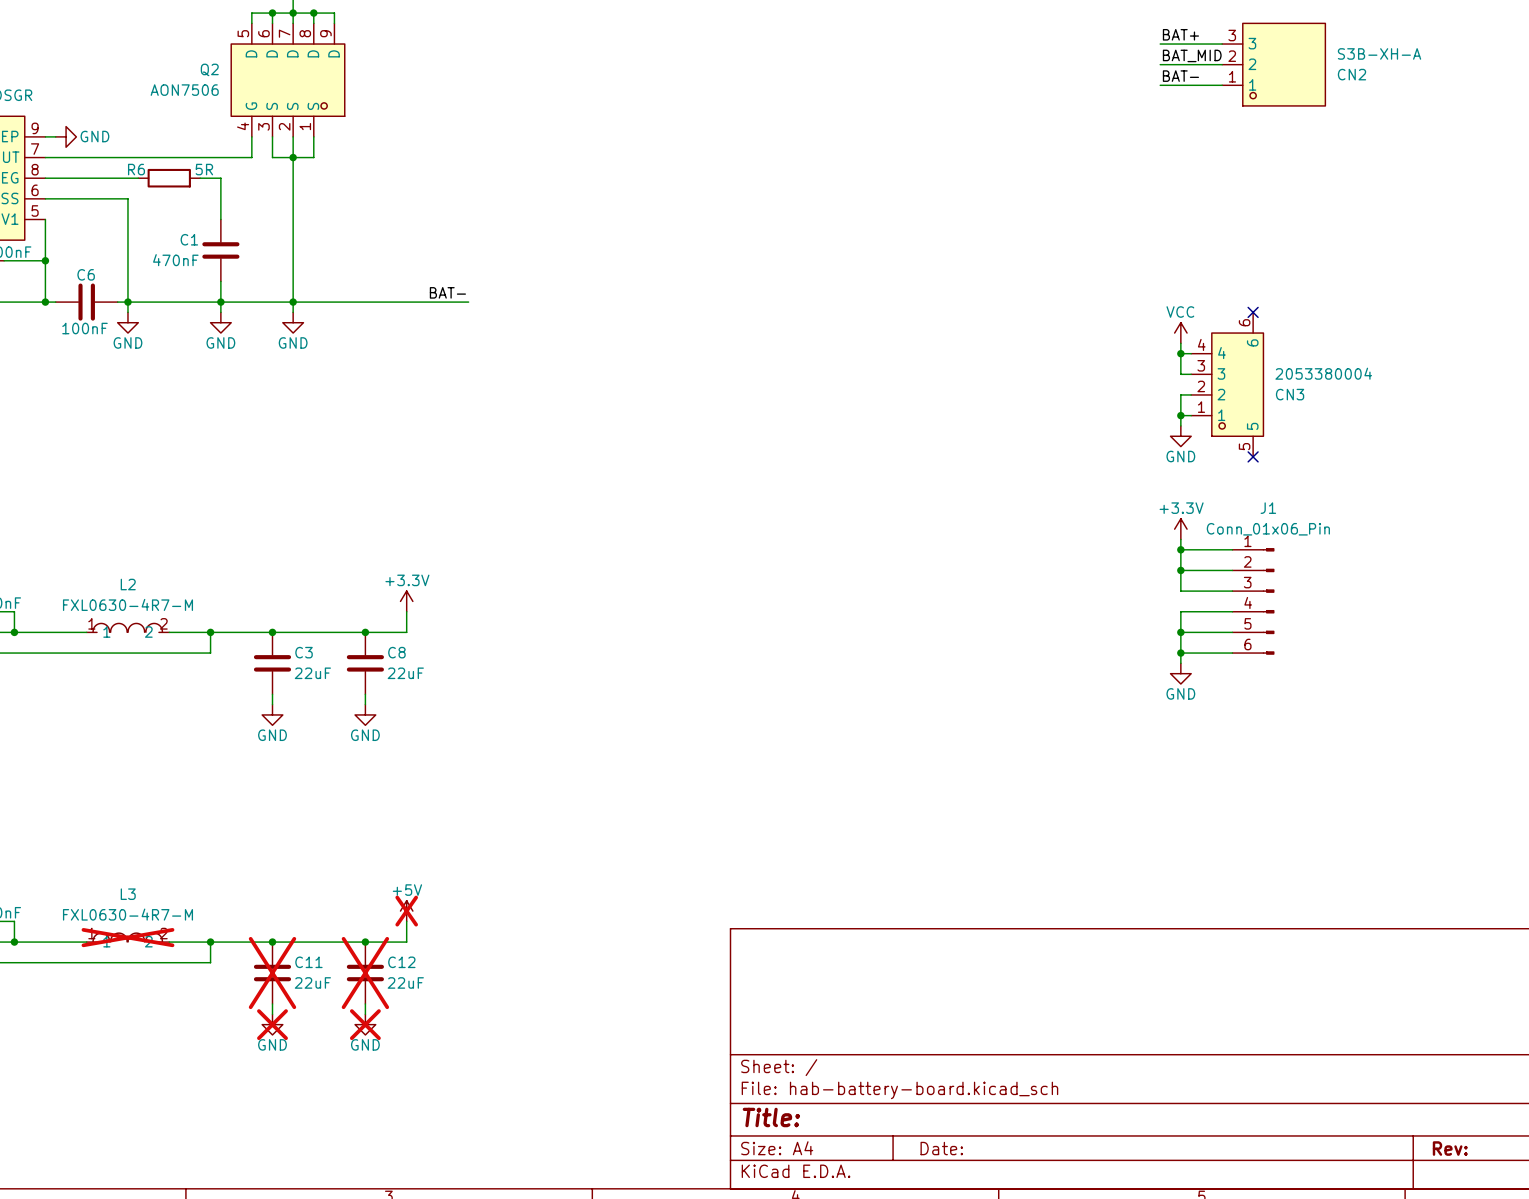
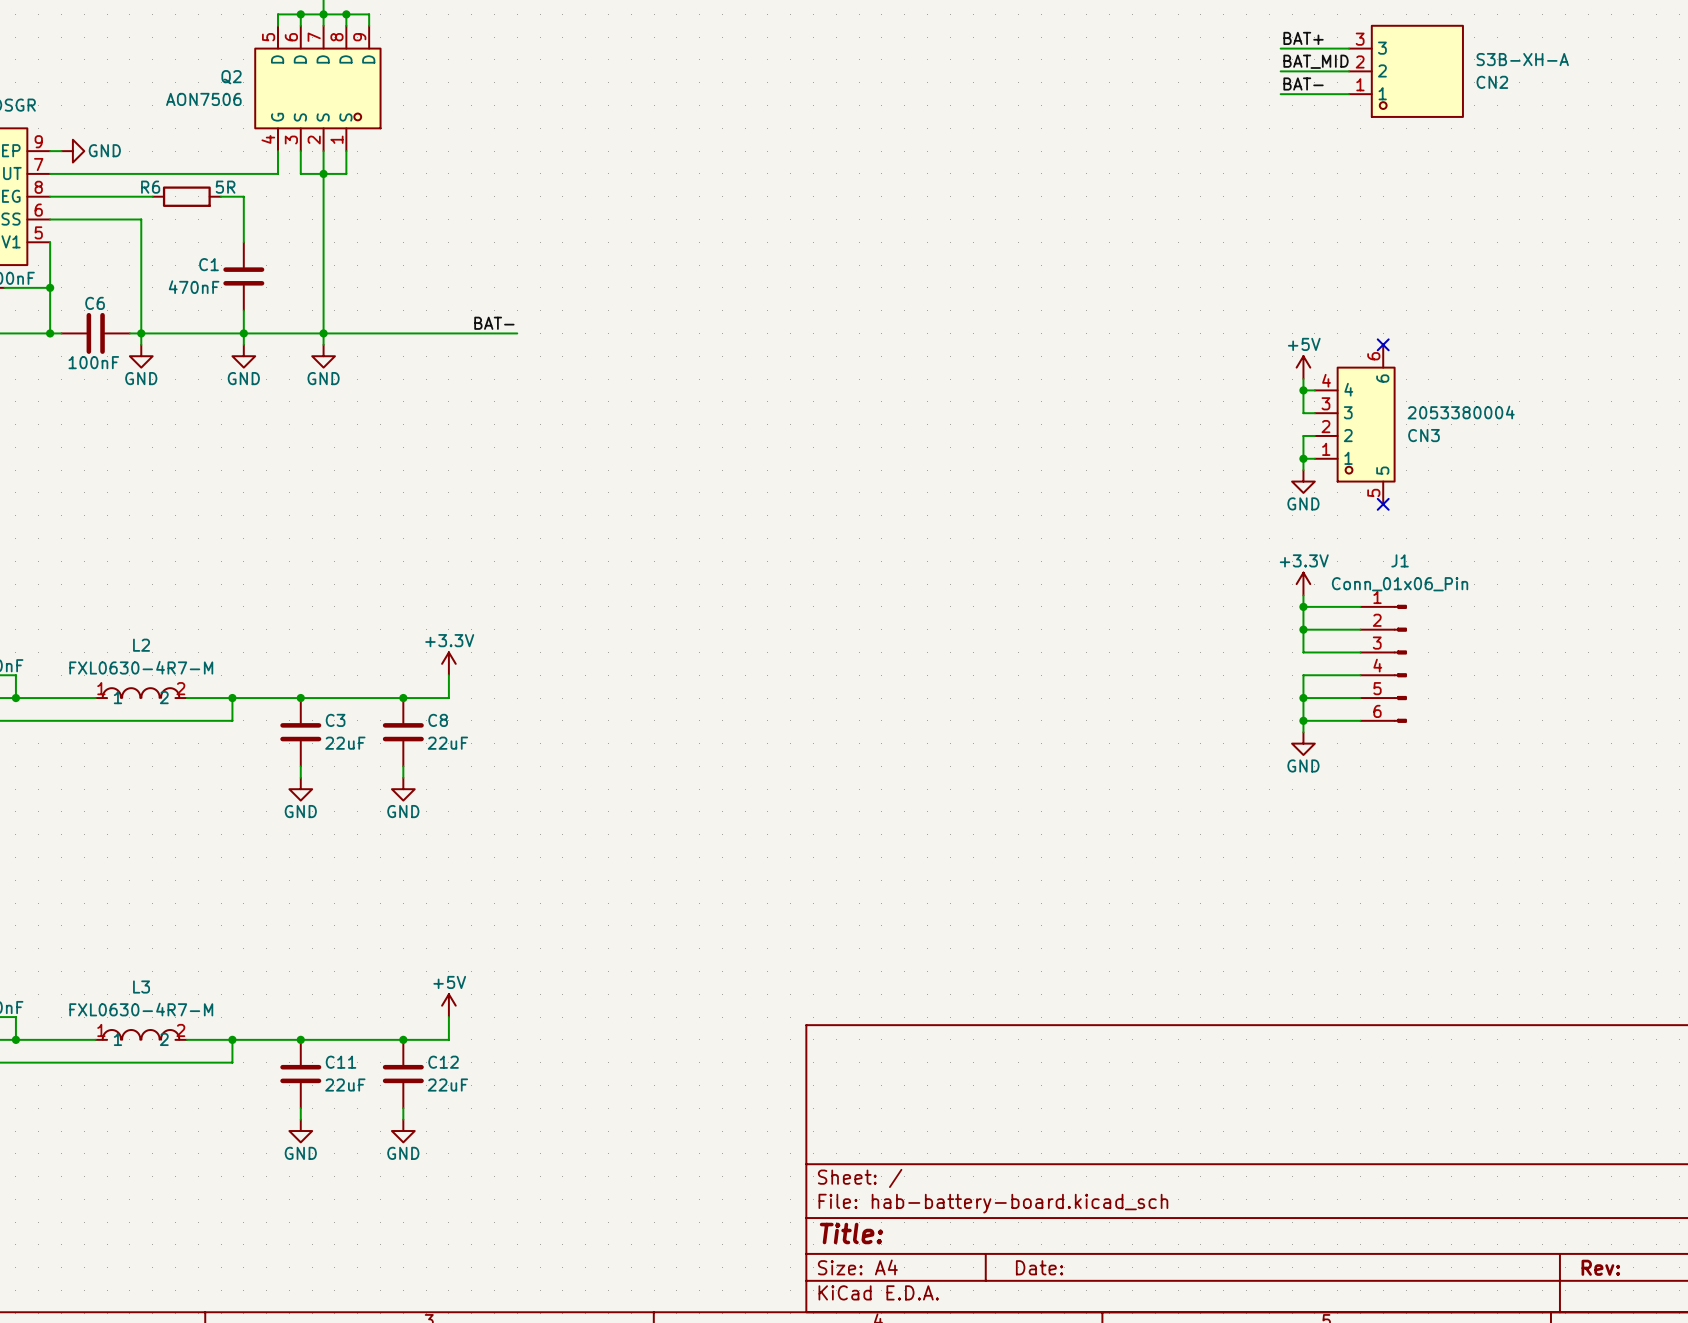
power symbol: VCC (1180, 333) -> +5V (1303, 367)
power symbol do-not-place cross: (406, 911) -> none
L3 do-not-place cross: (127, 937) -> none
C11 do-not-place cross: (272, 973) -> none
C12 do-not-place cross: (365, 973) -> none
power symbol do-not-place cross: (272, 1024) -> none
power symbol do-not-place cross: (365, 1024) -> none

